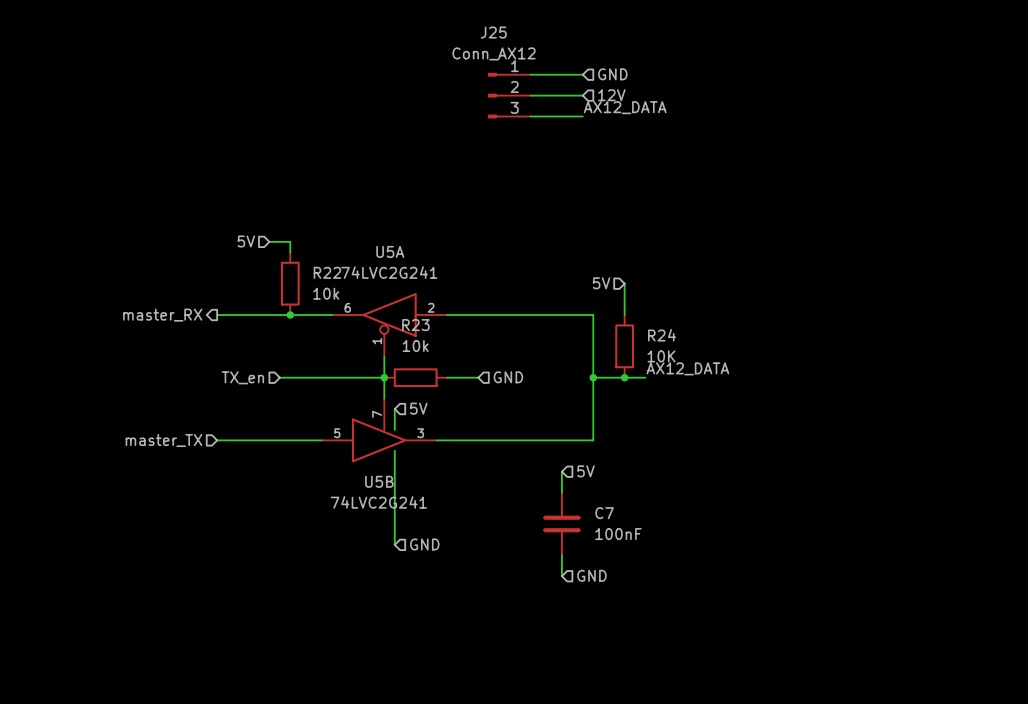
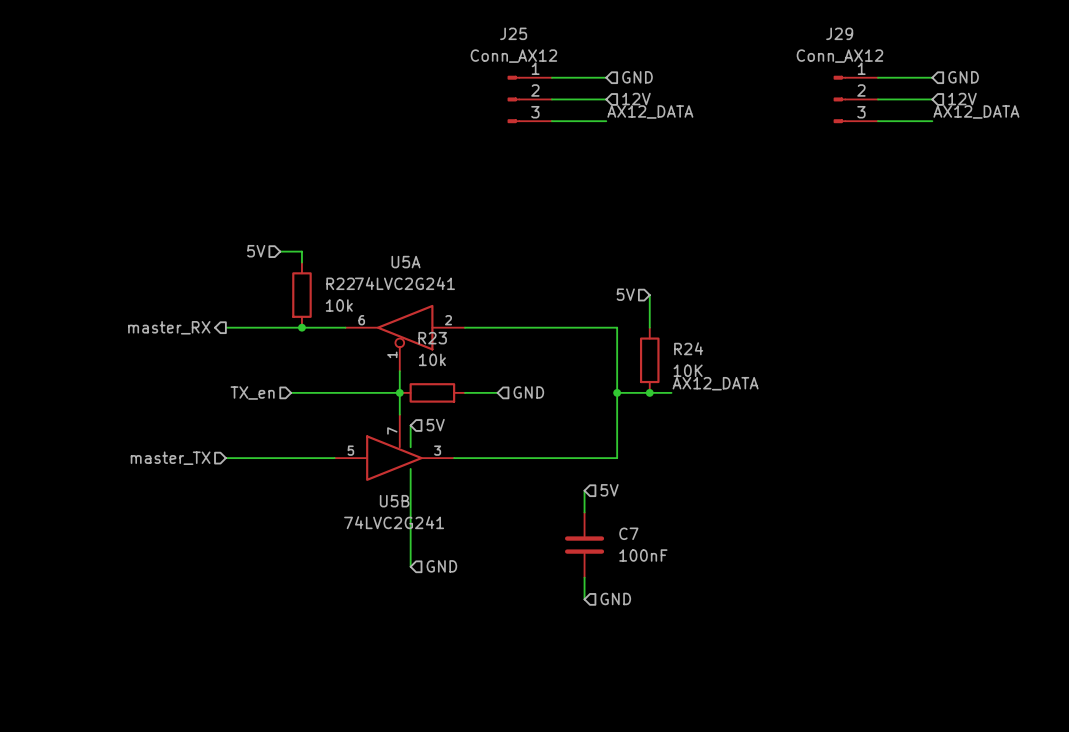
wire: none -> (877, 77) (932, 77)
hierarchical label: none -> GND (963, 77)
J29: none -> Conn_AX12 (855, 99)
wire: none -> (877, 99) (932, 99)
hierarchical label: none -> 12V (962, 99)
label: none -> AX12_DATA (976, 112)
wire: none -> (877, 121) (932, 121)

